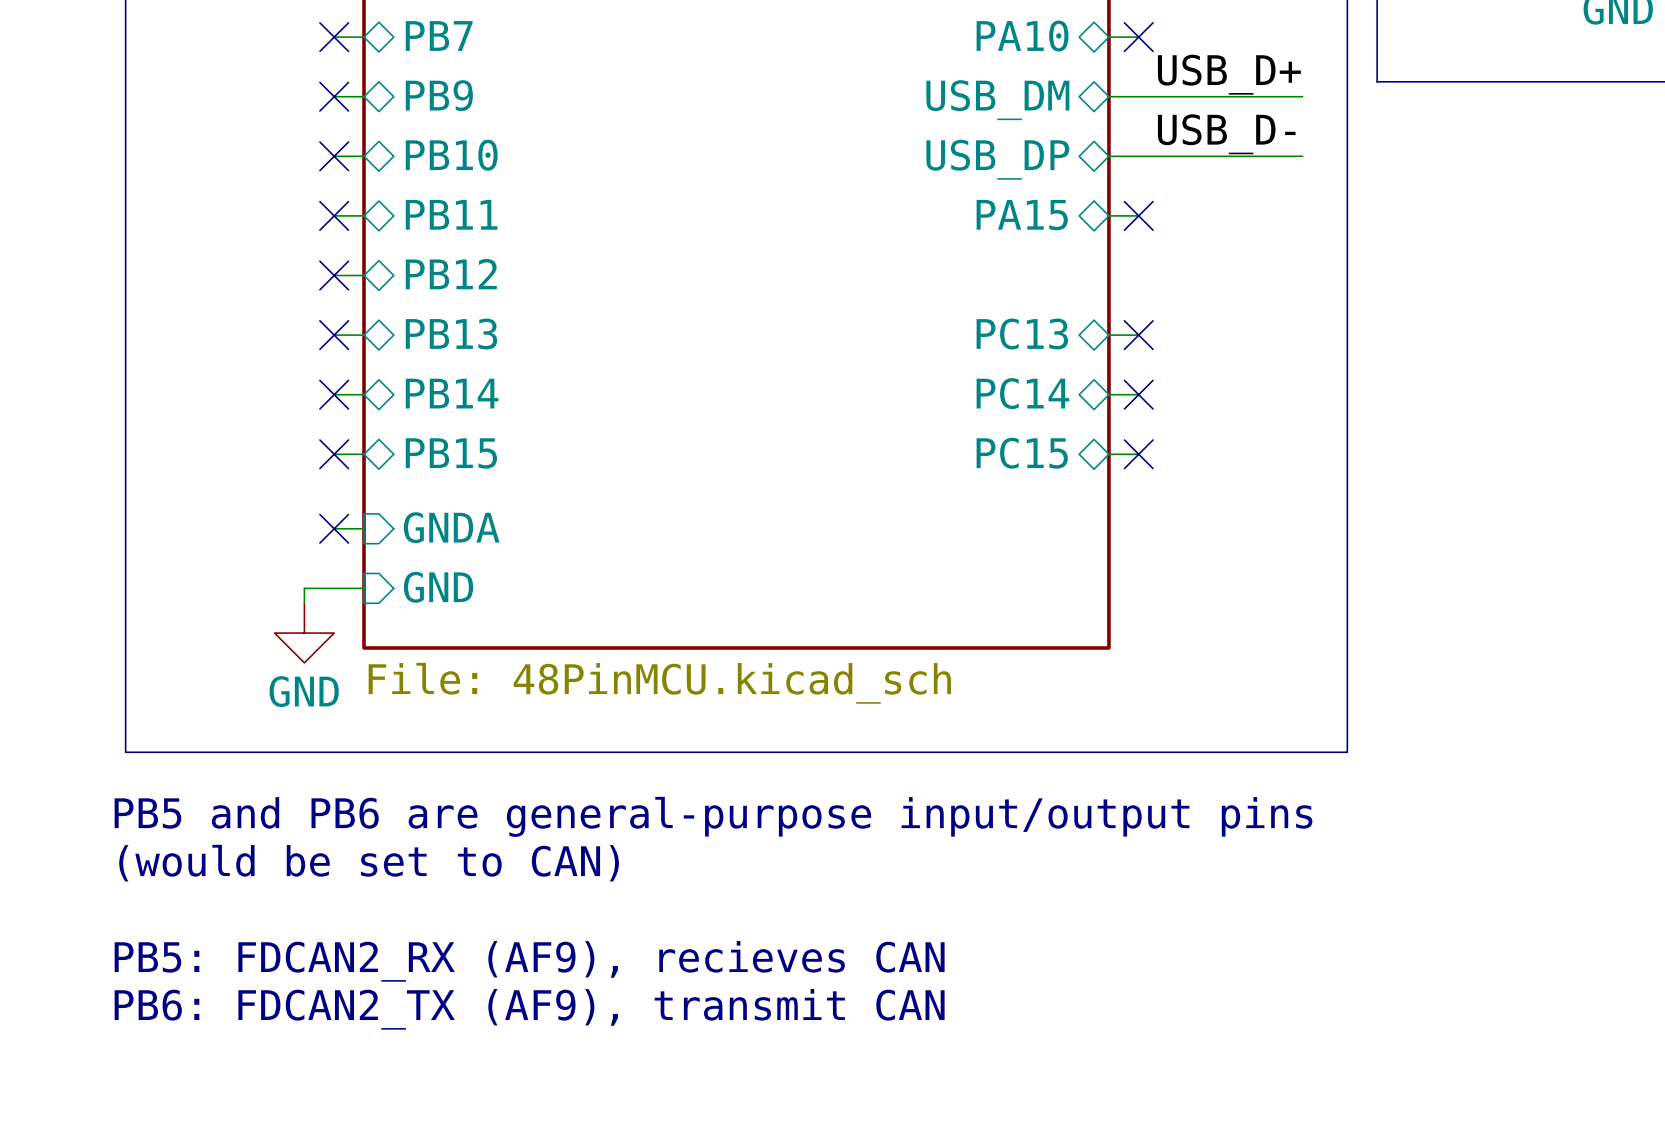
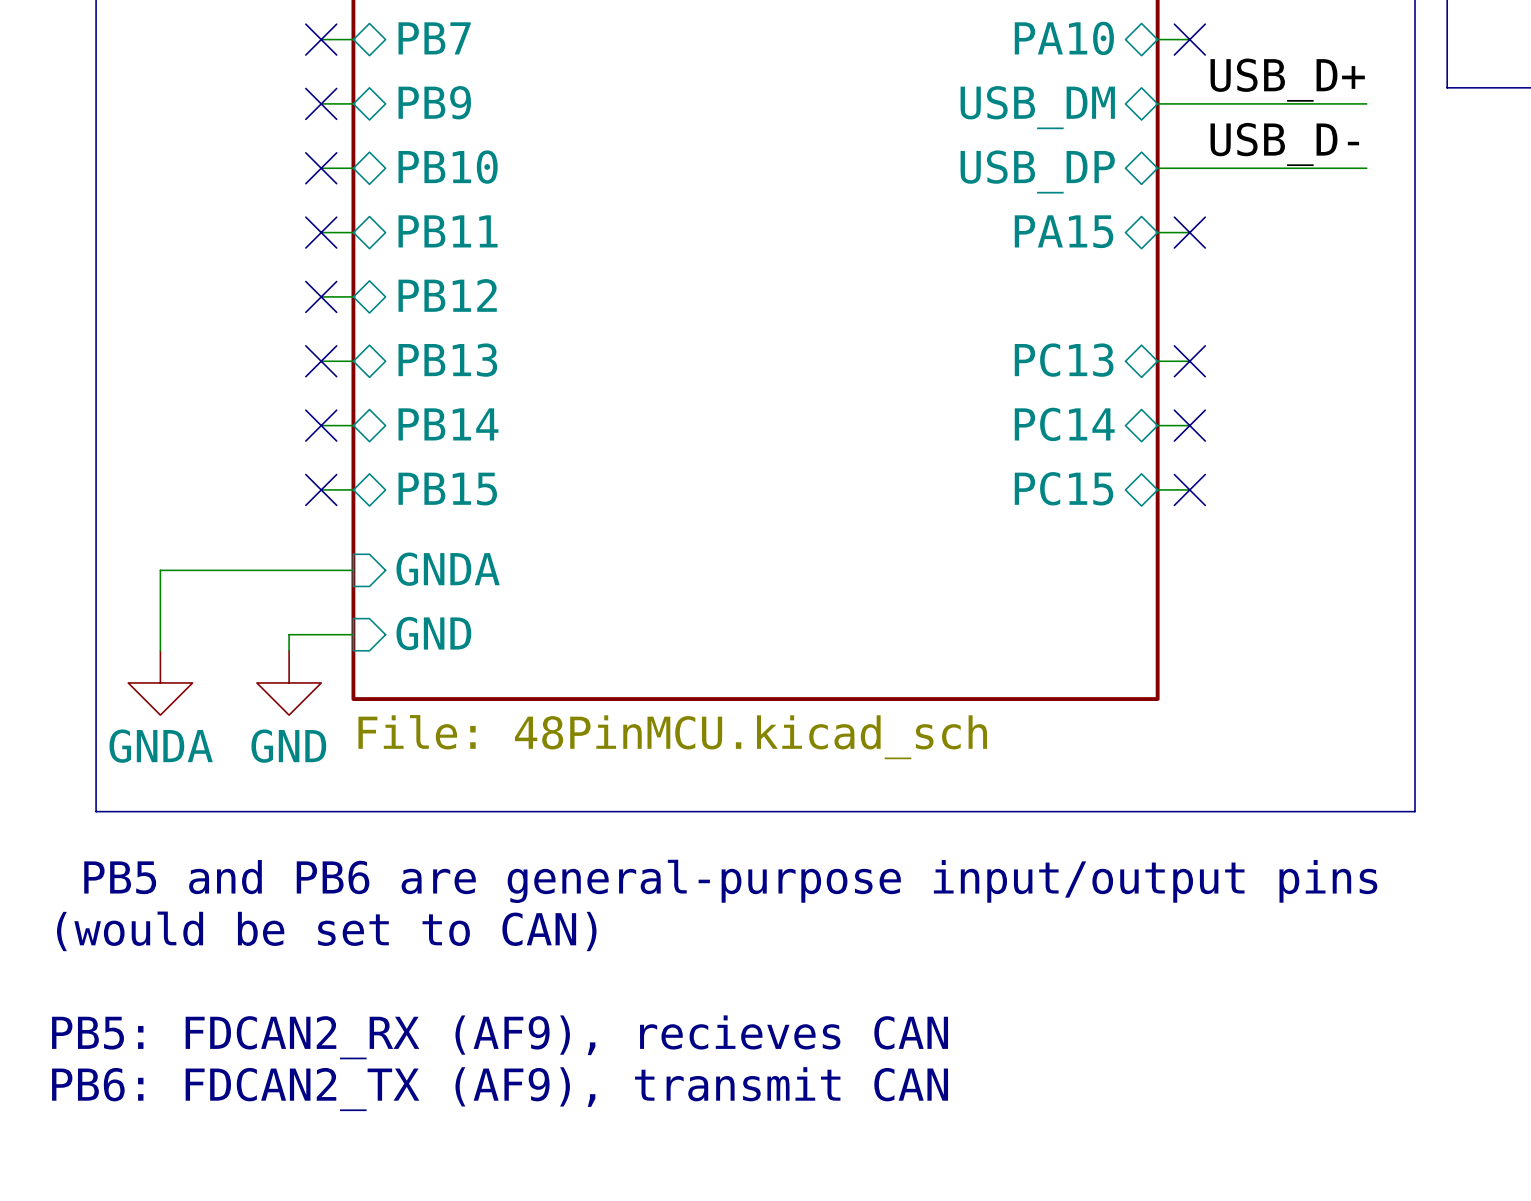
wire: none -> (321, 570) (160, 570) (160, 650)
no-connect mark: (334, 528) -> none
power symbol: none -> GNDA (160, 682)
text position: (would be set to CAN) (369, 863) -> (would be set to CAN) (326, 931)
text position: PB5: FDCAN2_RX (AF9), recieves CAN (529, 961) -> PB5: FDCAN2_RX (AF9), recieves CAN (500, 1037)
text position: PB6: FDCAN2_TX (AF9), transmit CAN (529, 1009) -> PB6: FDCAN2_TX (AF9), transmit CAN (500, 1089)

